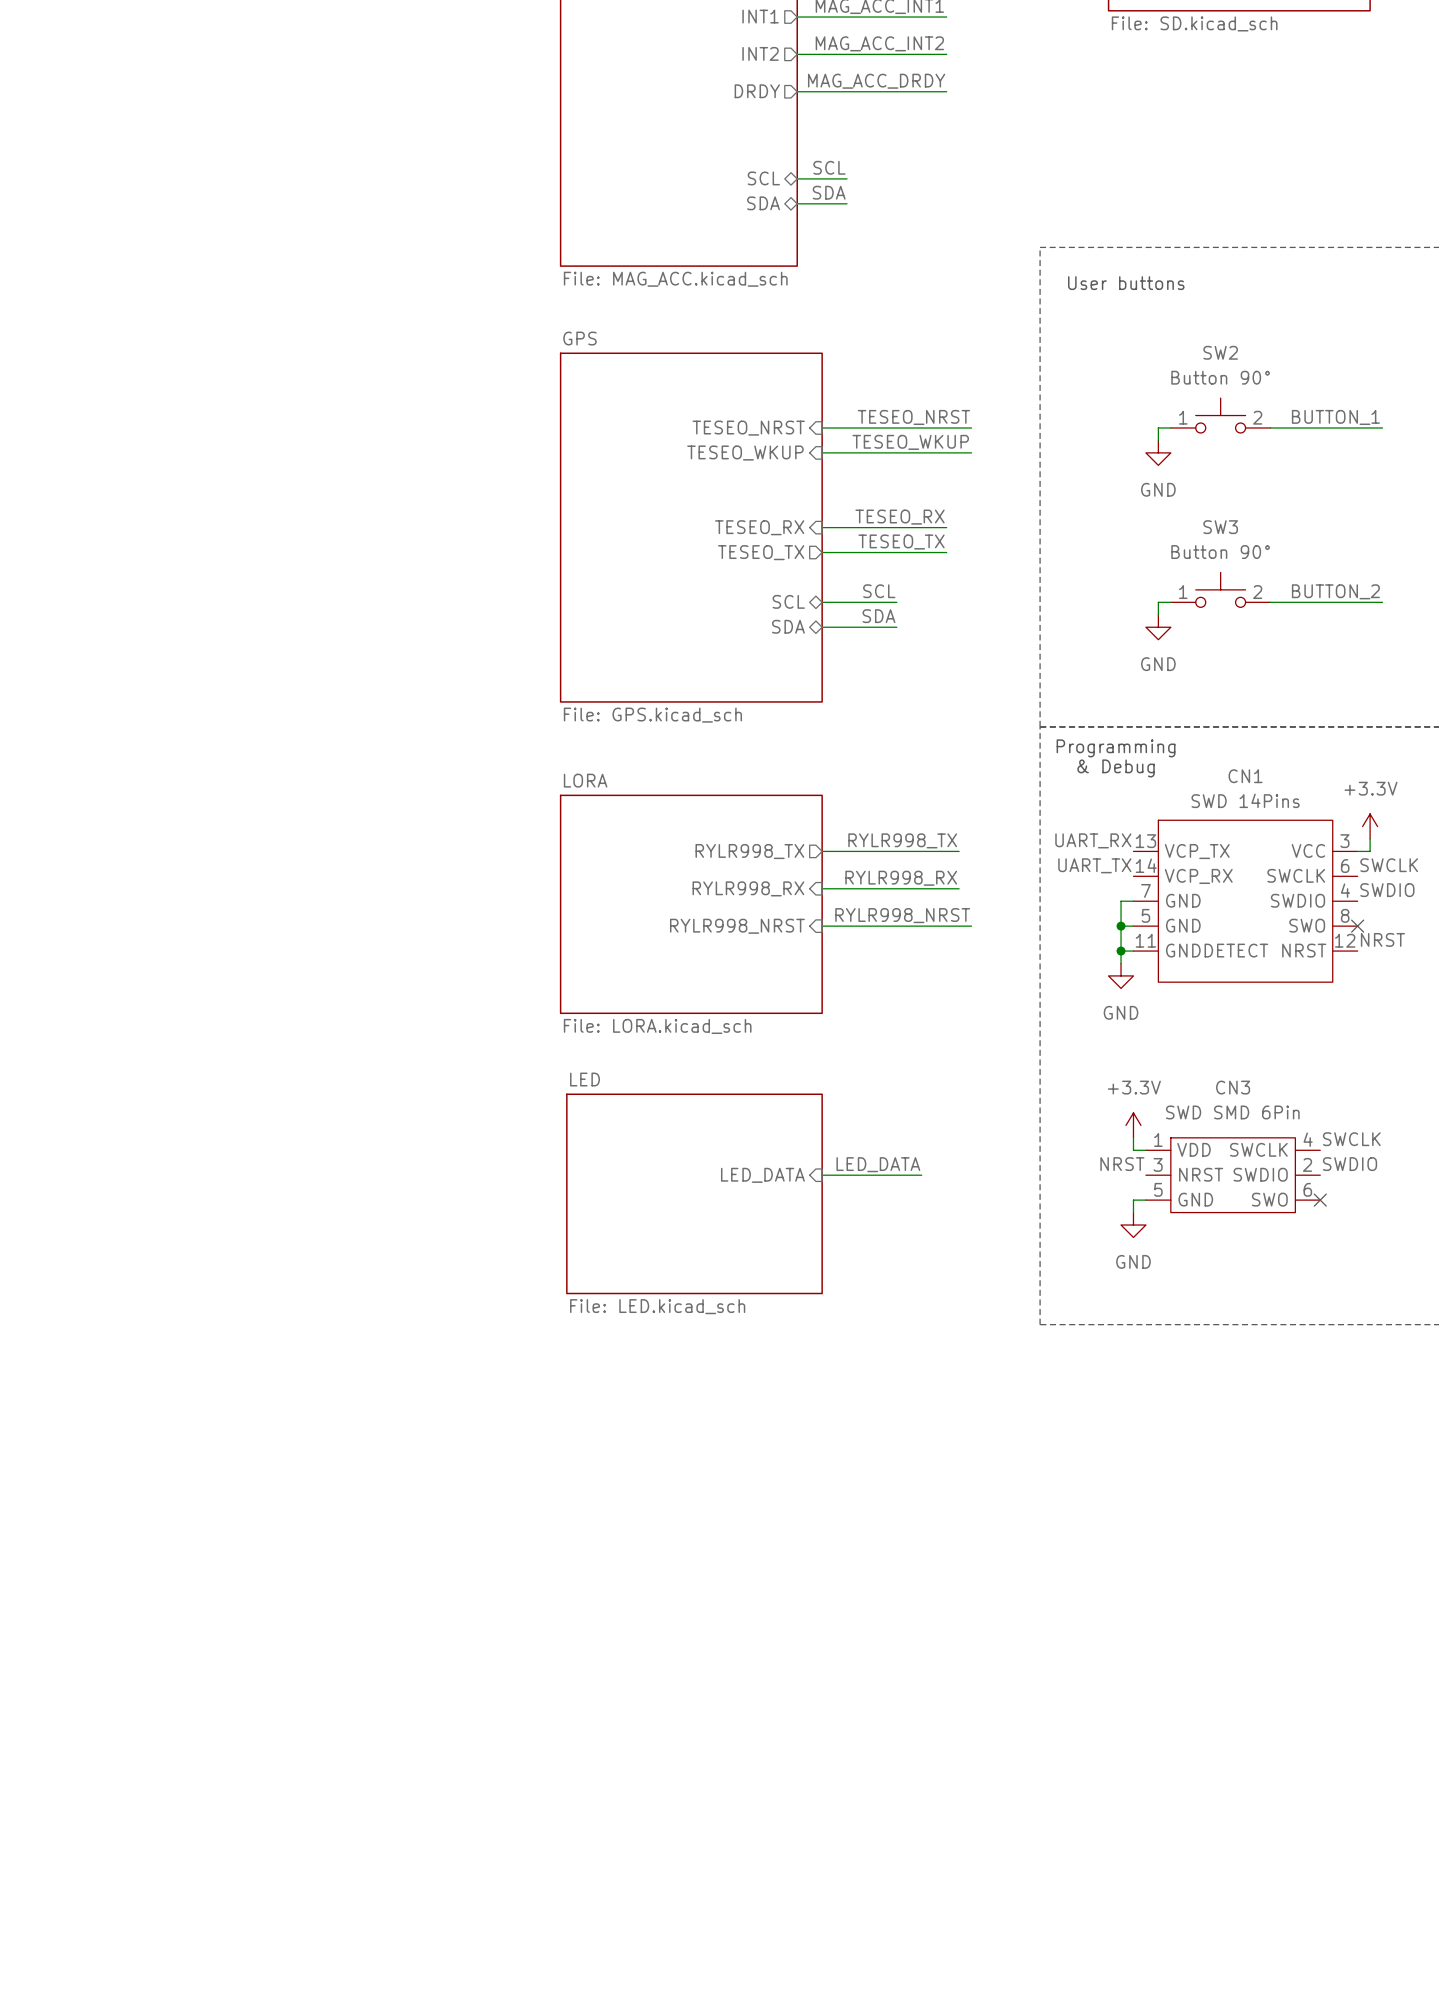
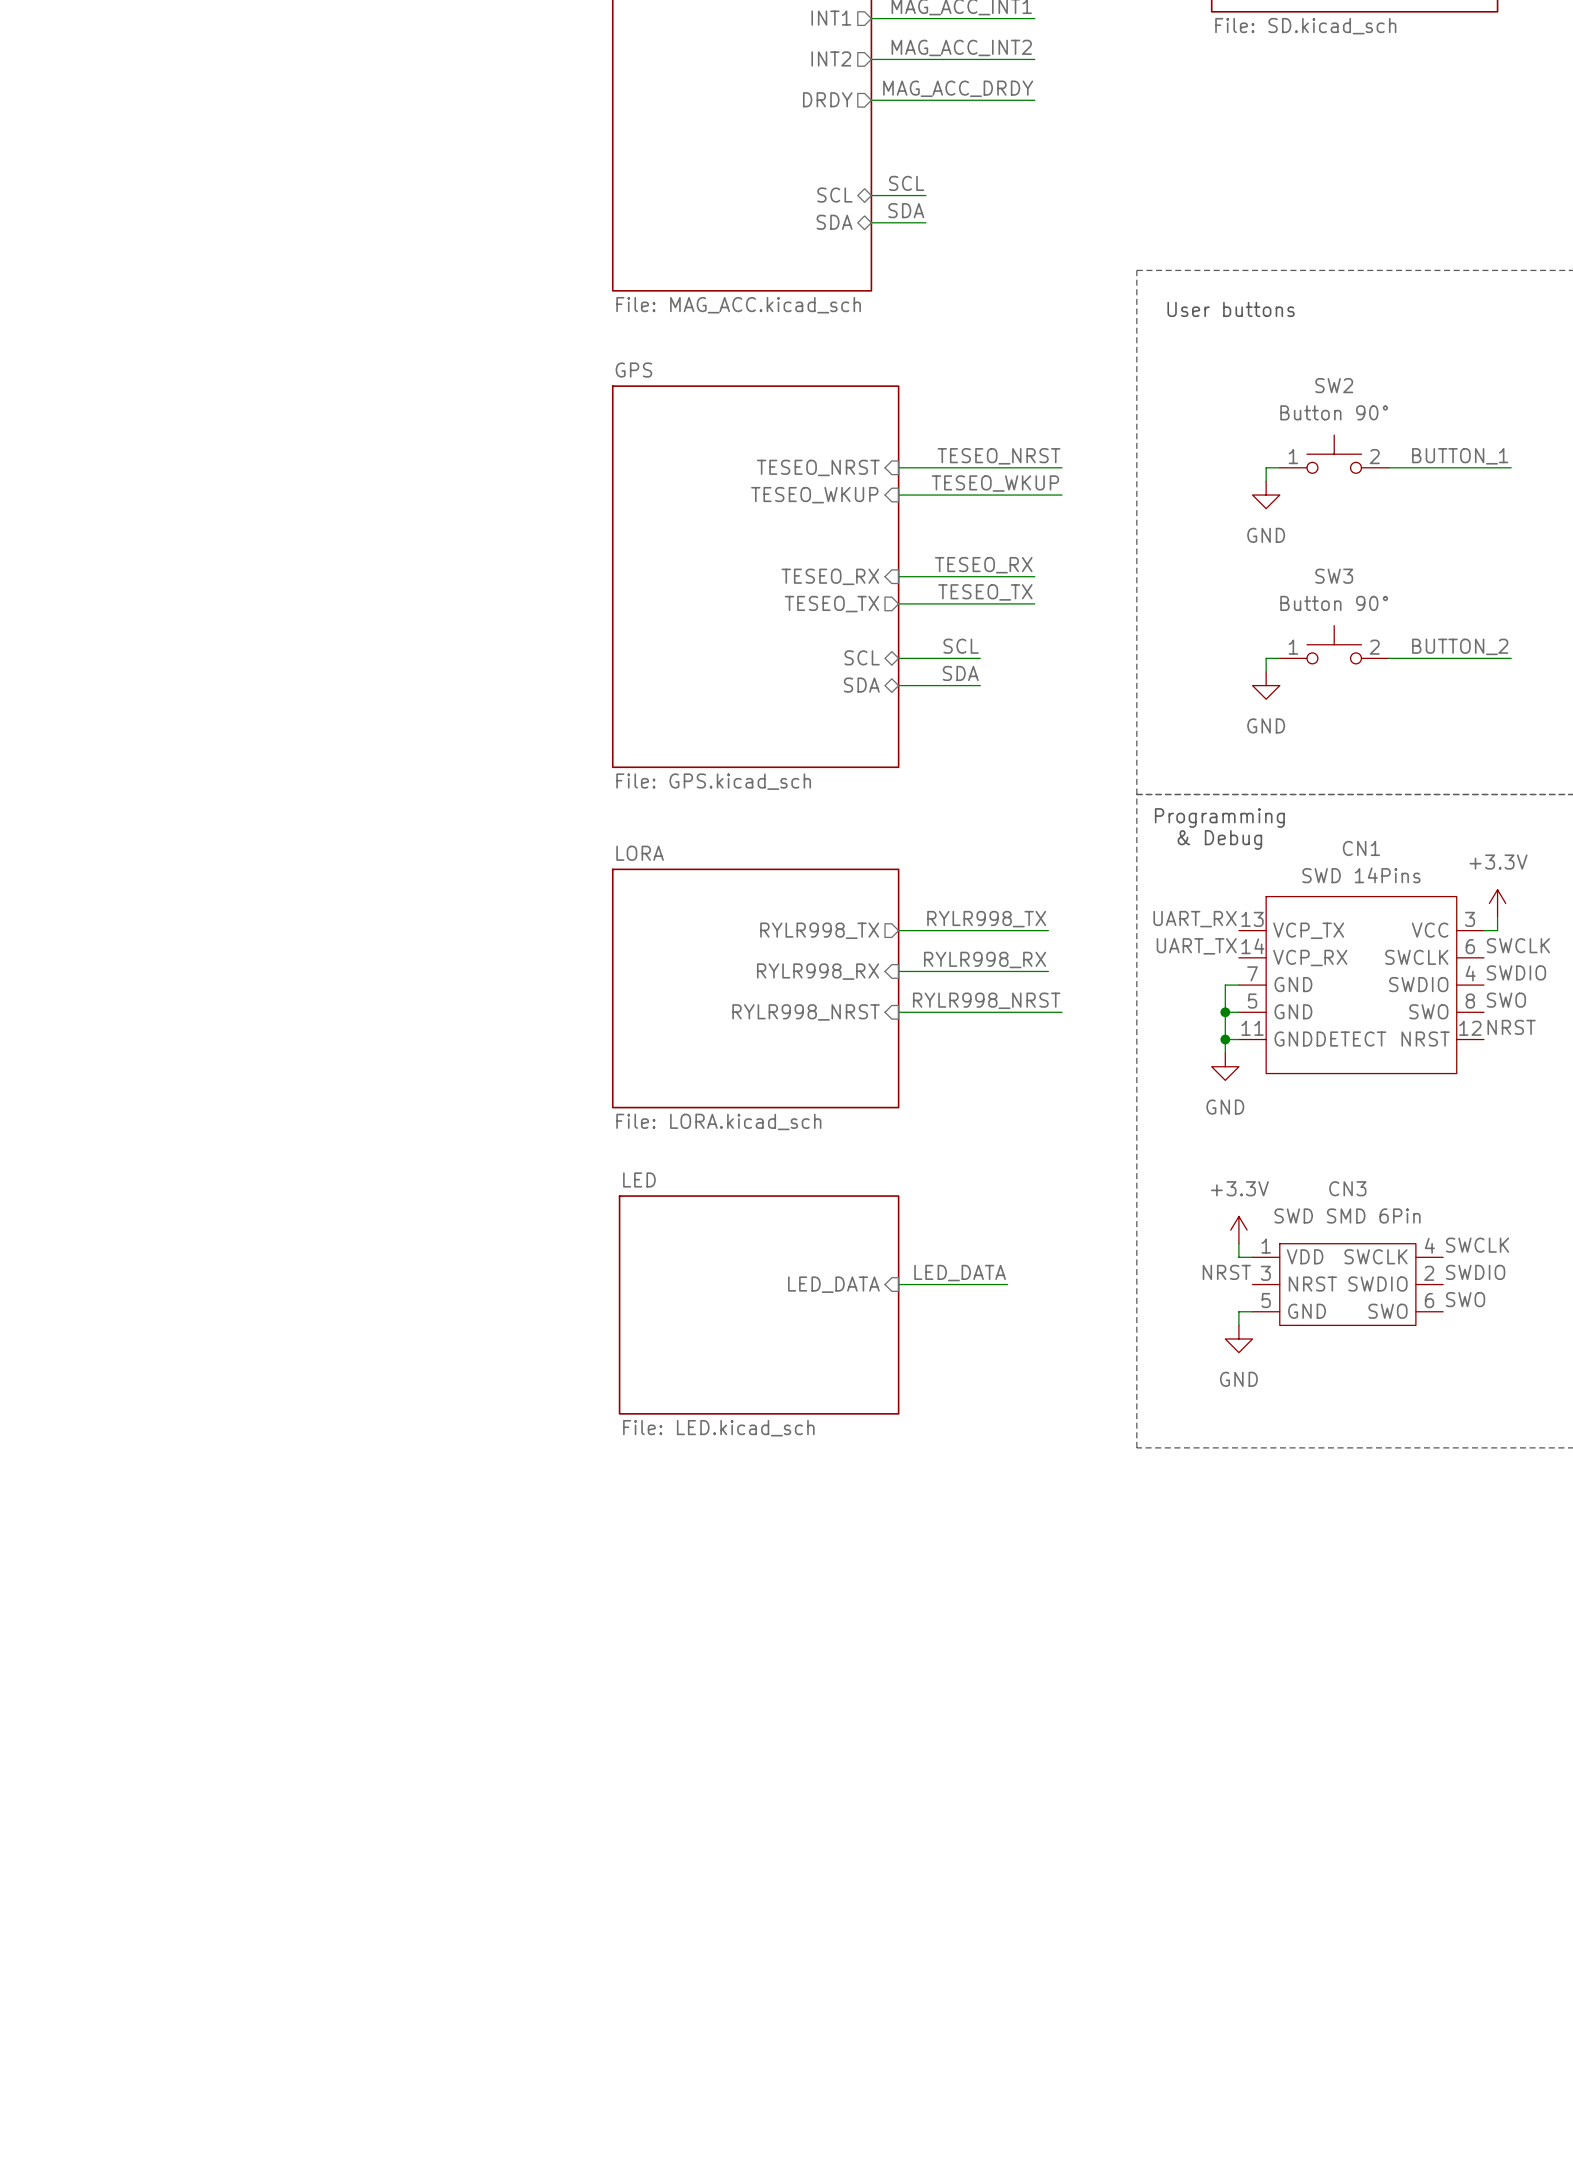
label: none -> SWO (1506, 1000)
no-connect mark: (1357, 926) -> none
label: none -> SWO (1465, 1299)
no-connect mark: (1320, 1200) -> none

